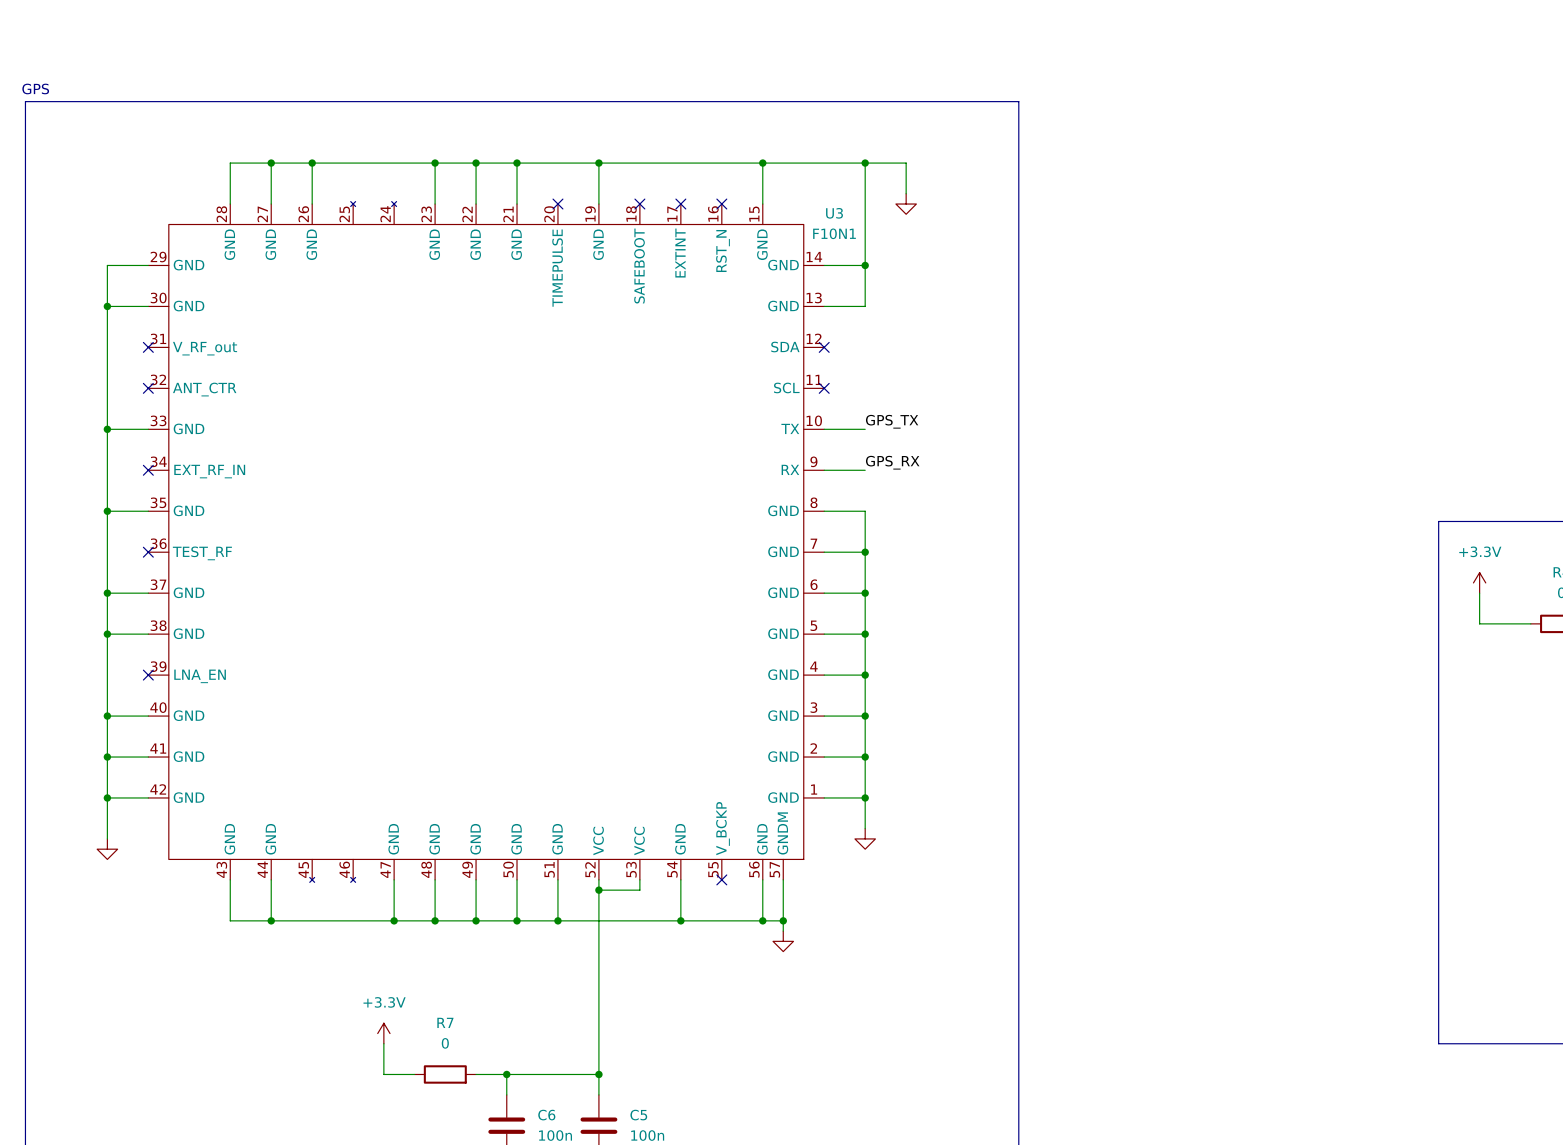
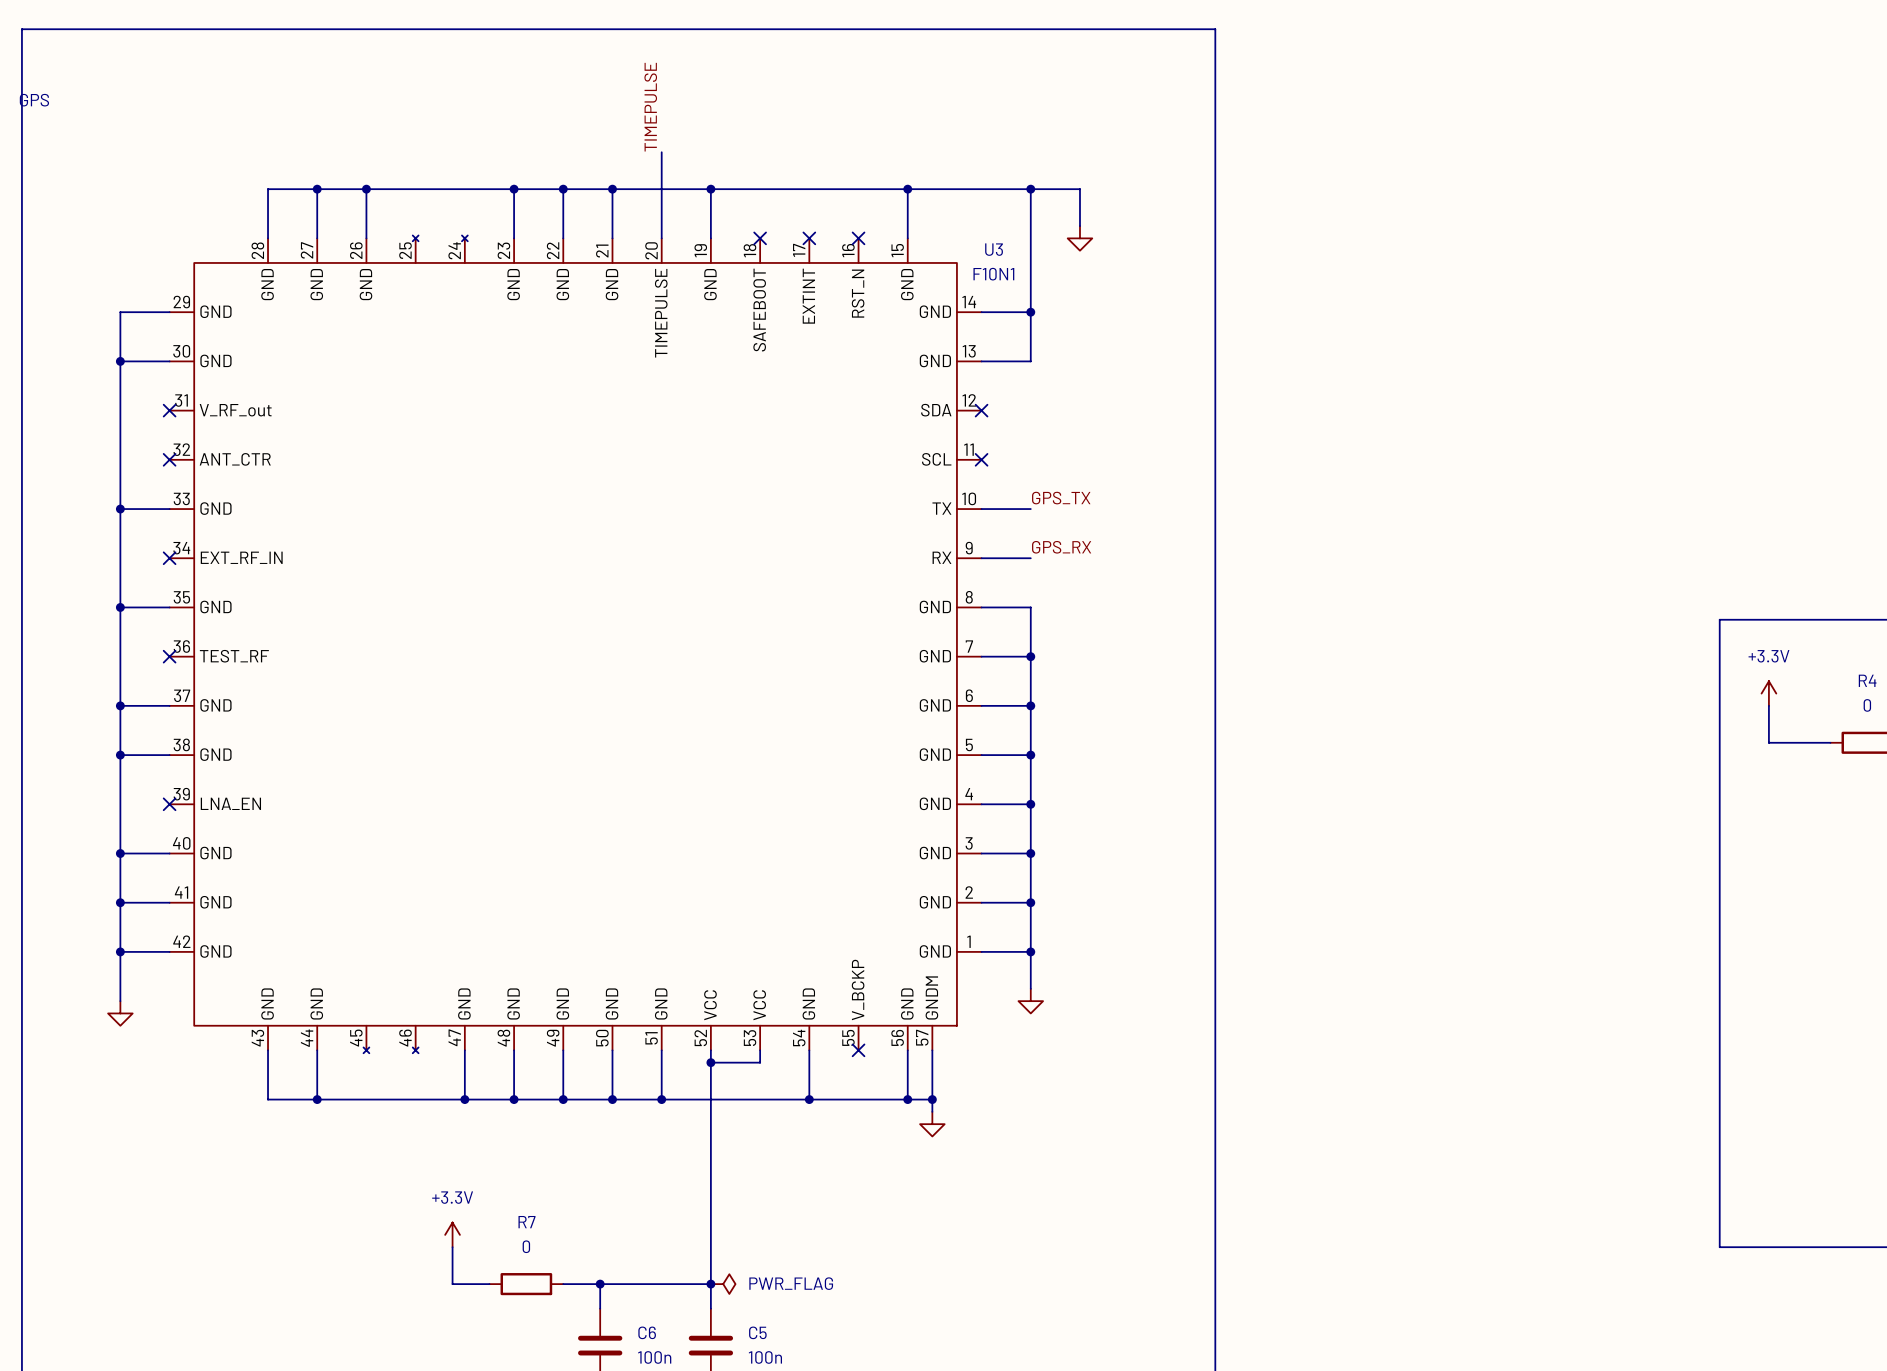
label: none -> TIMEPULSE (650, 107)
line: (25, 101) (1018, 101) -> (21, 115) (21, 29) (1215, 29) (1215, 115)
wire: none -> (661, 152) (661, 238)
no-connect mark: (557, 204) -> none
power symbol: none -> PWR_FLAG (723, 1284)

